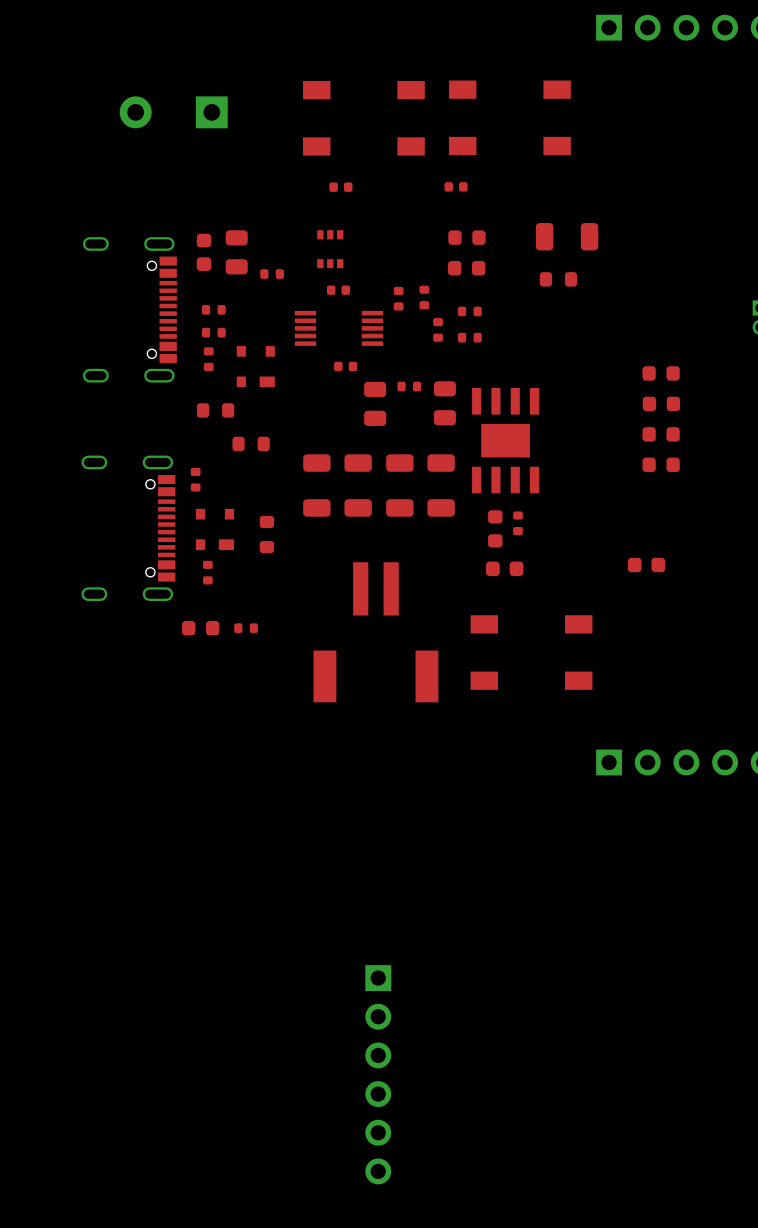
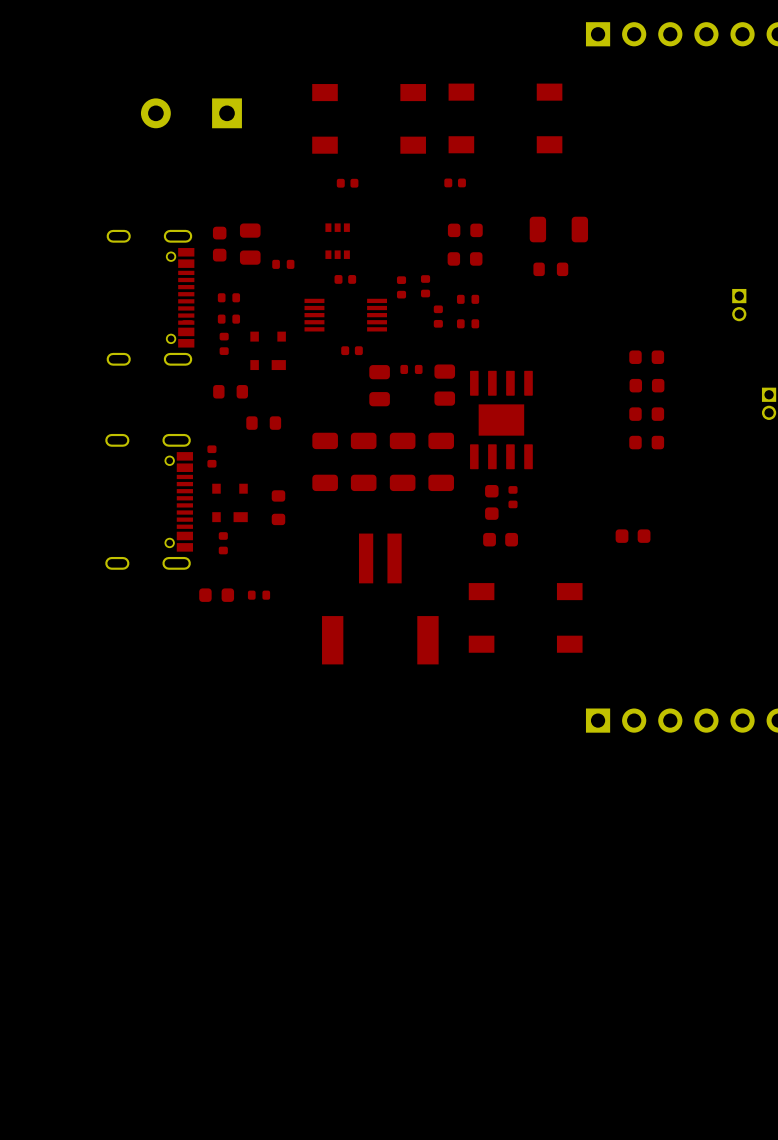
part: (378, 1074) -> none

